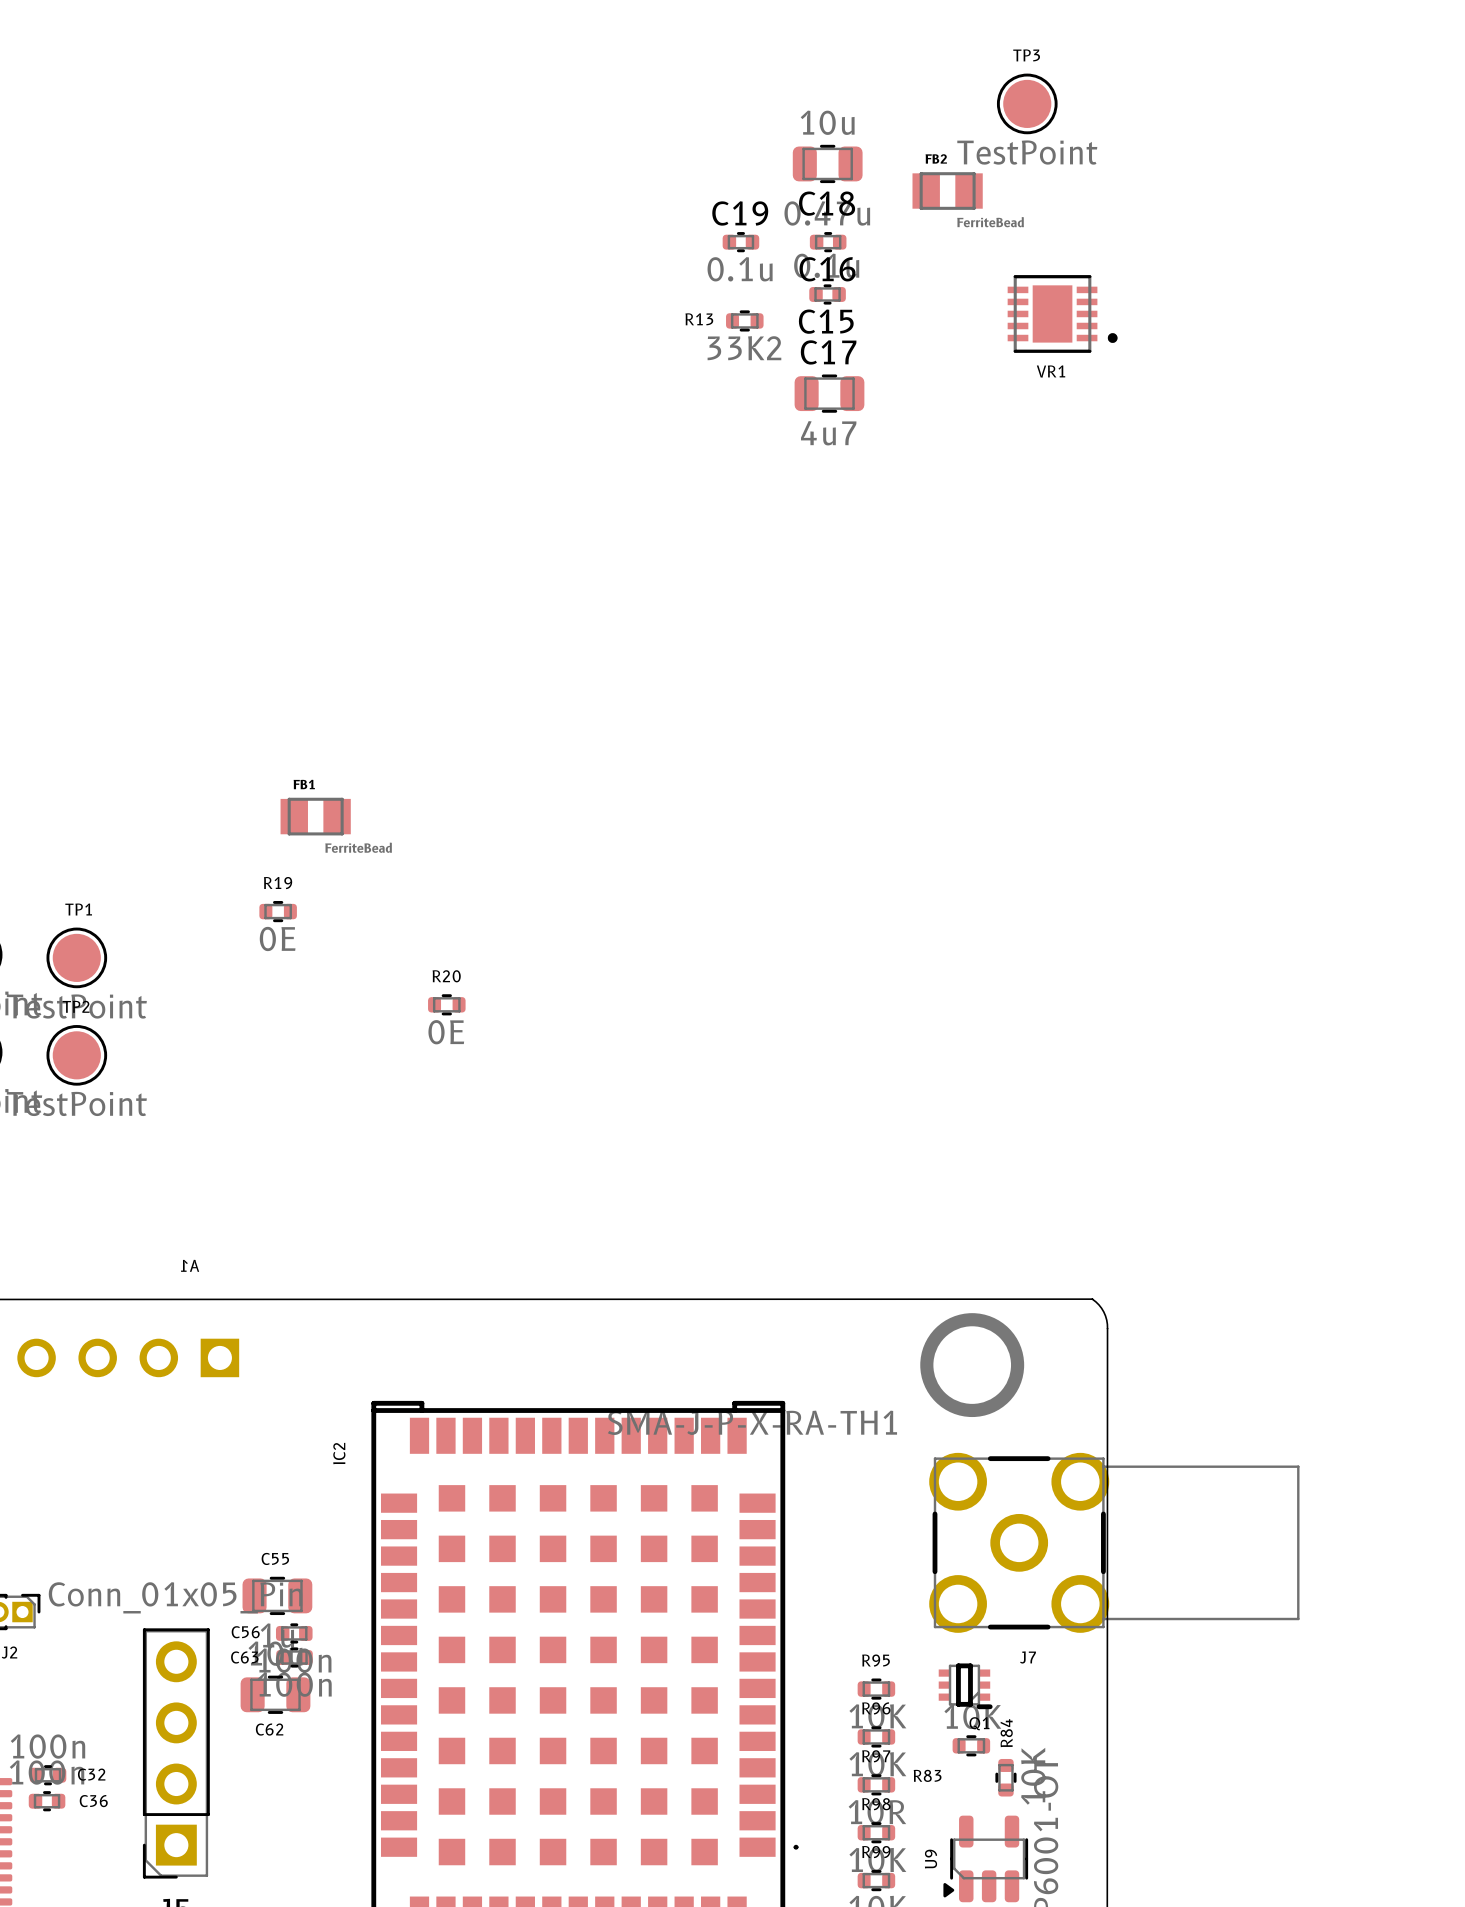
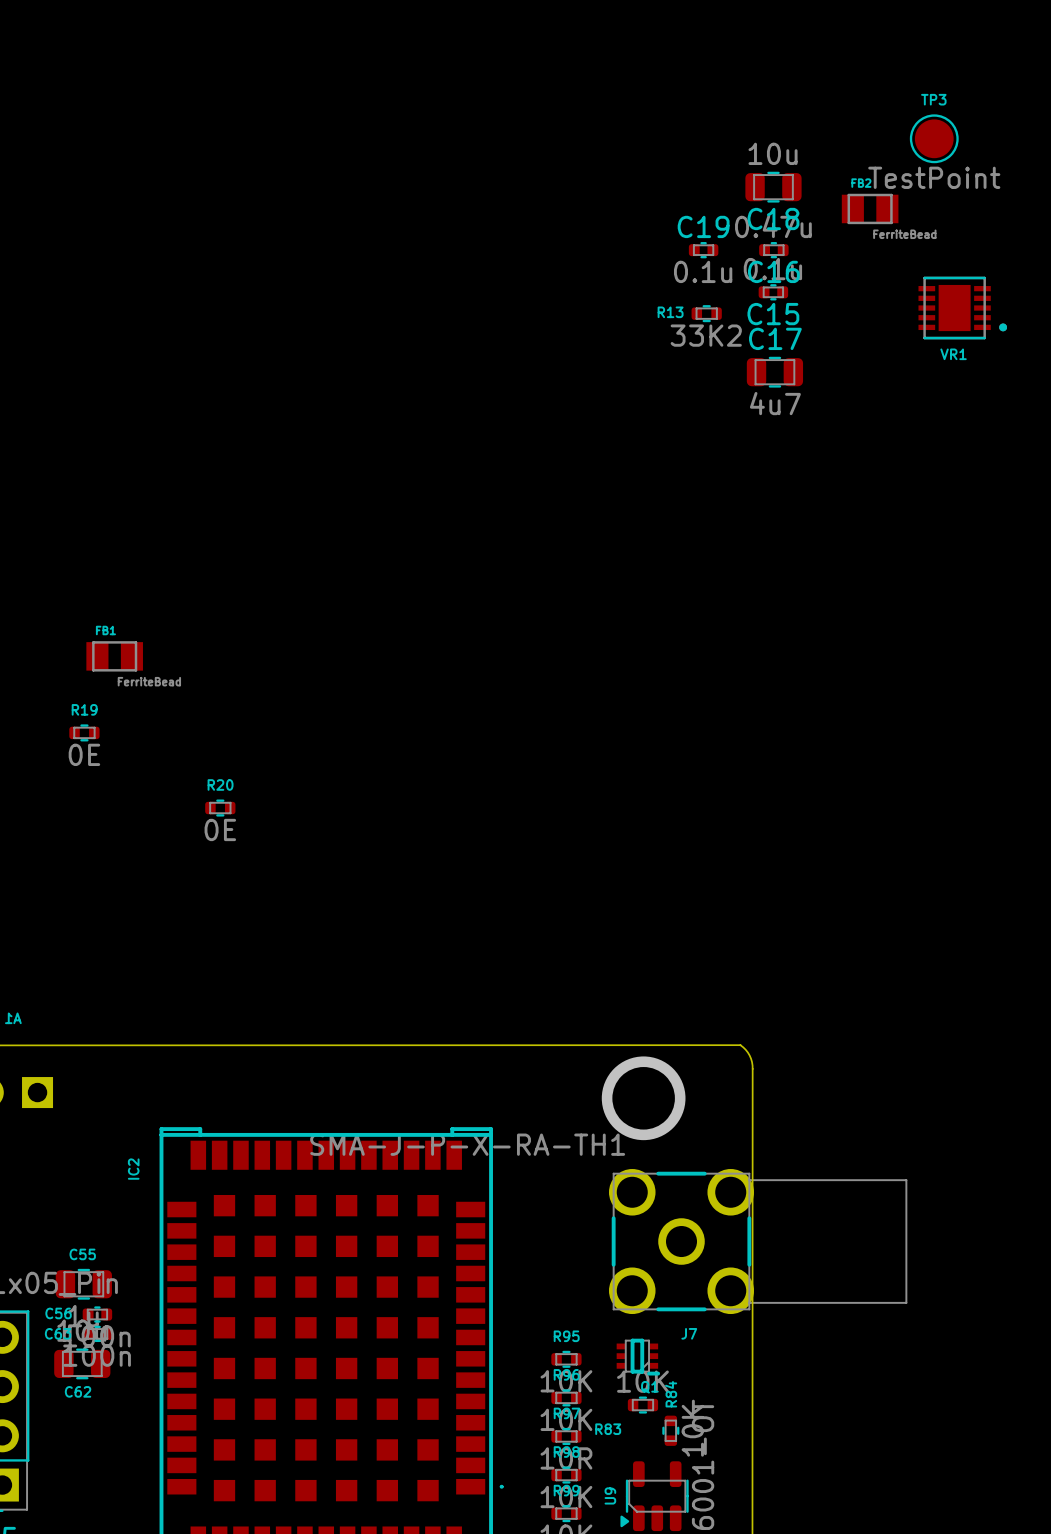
TP3 position: (1027, 103) -> (934, 138)
C18 position: (827, 163) -> (773, 187)
FB2 position: (947, 191) -> (870, 208)
C19 position: (740, 242) -> (703, 250)
C16 position: (828, 242) -> (773, 250)
C15 position: (827, 294) -> (773, 292)
VR1 position: (1062, 313) -> (962, 308)
R13 position: (744, 320) -> (706, 313)
C17 position: (829, 393) -> (774, 372)

